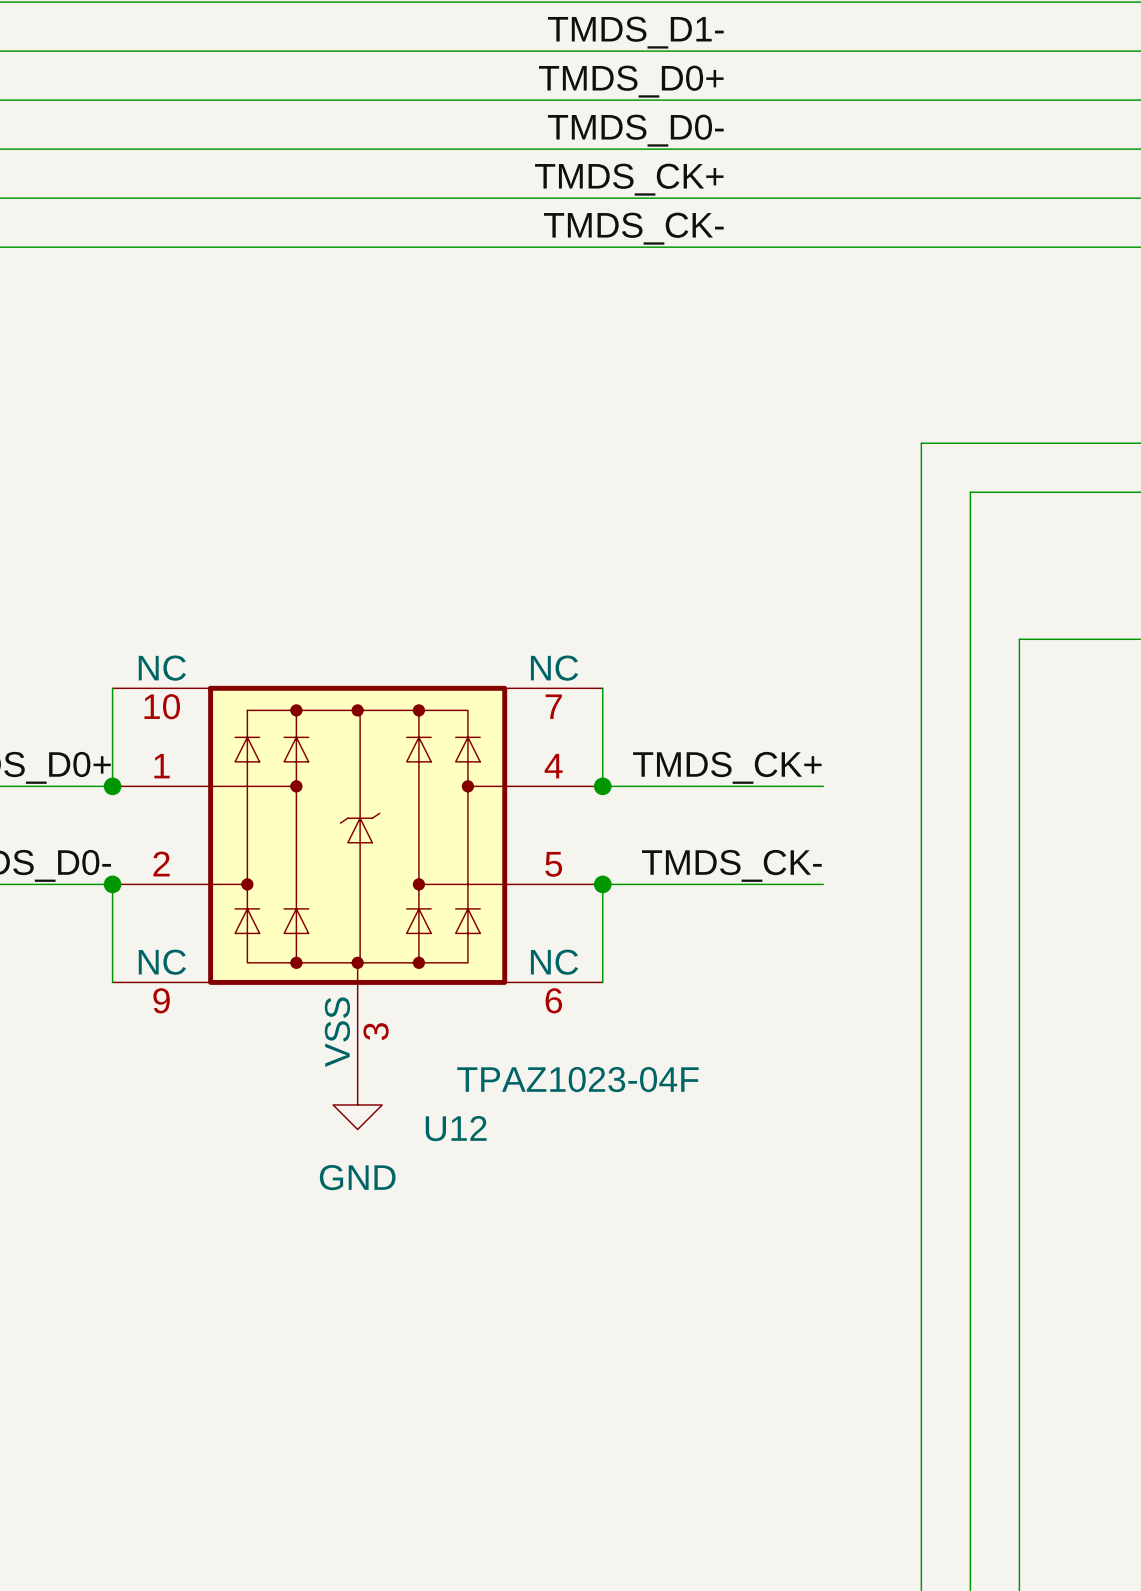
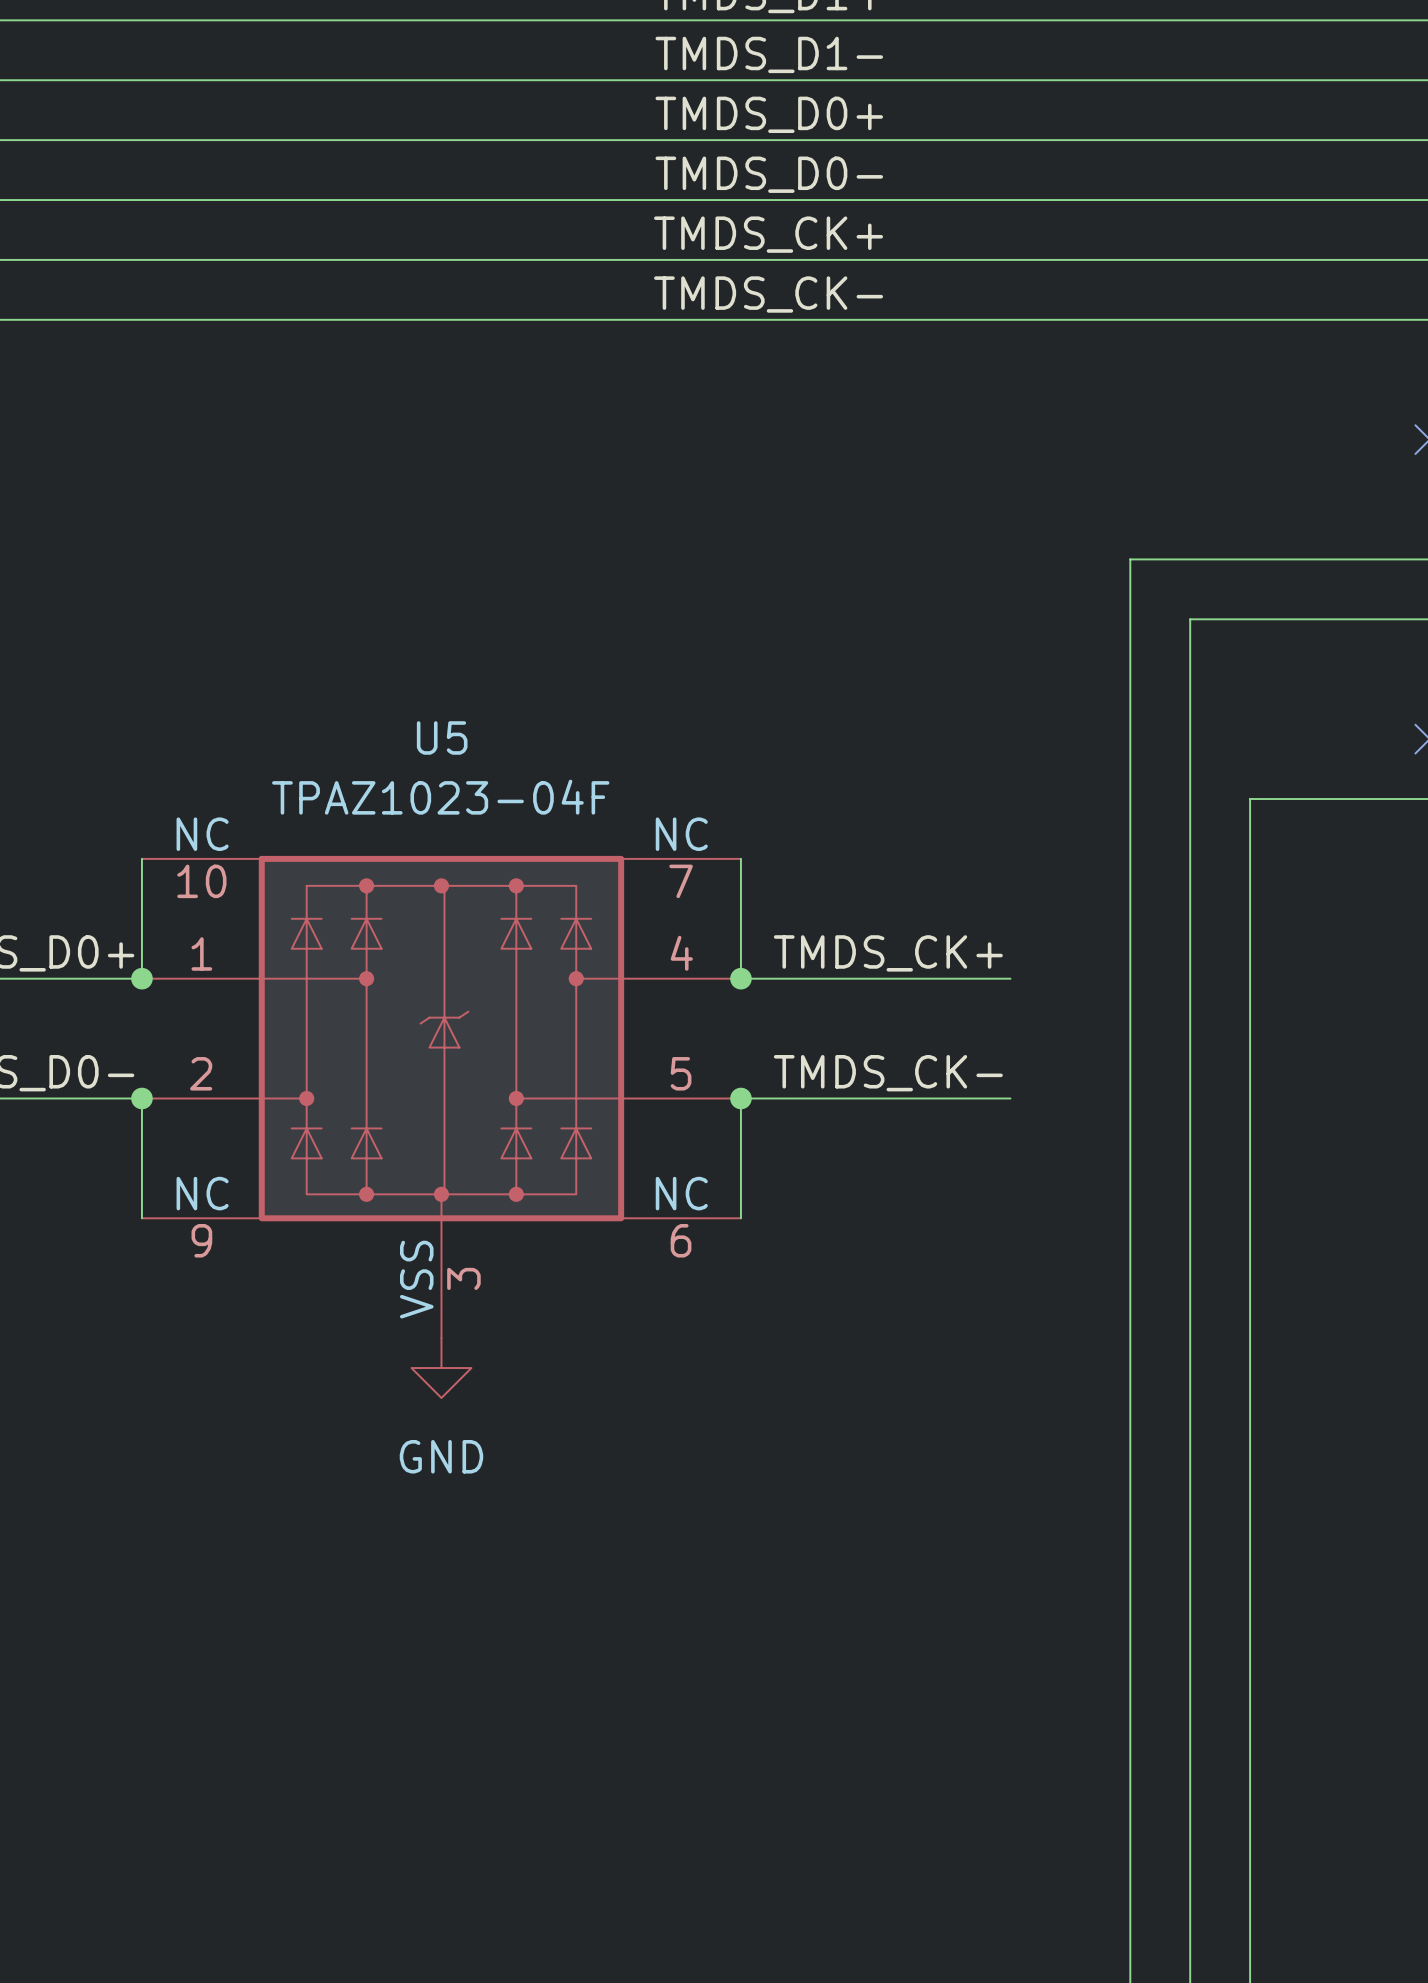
U12 value position: TPAZ1023-04F (577, 1079) -> TPAZ1023-04F (440, 797)
U12 name: U12 (456, 1128) -> U5 (442, 737)

